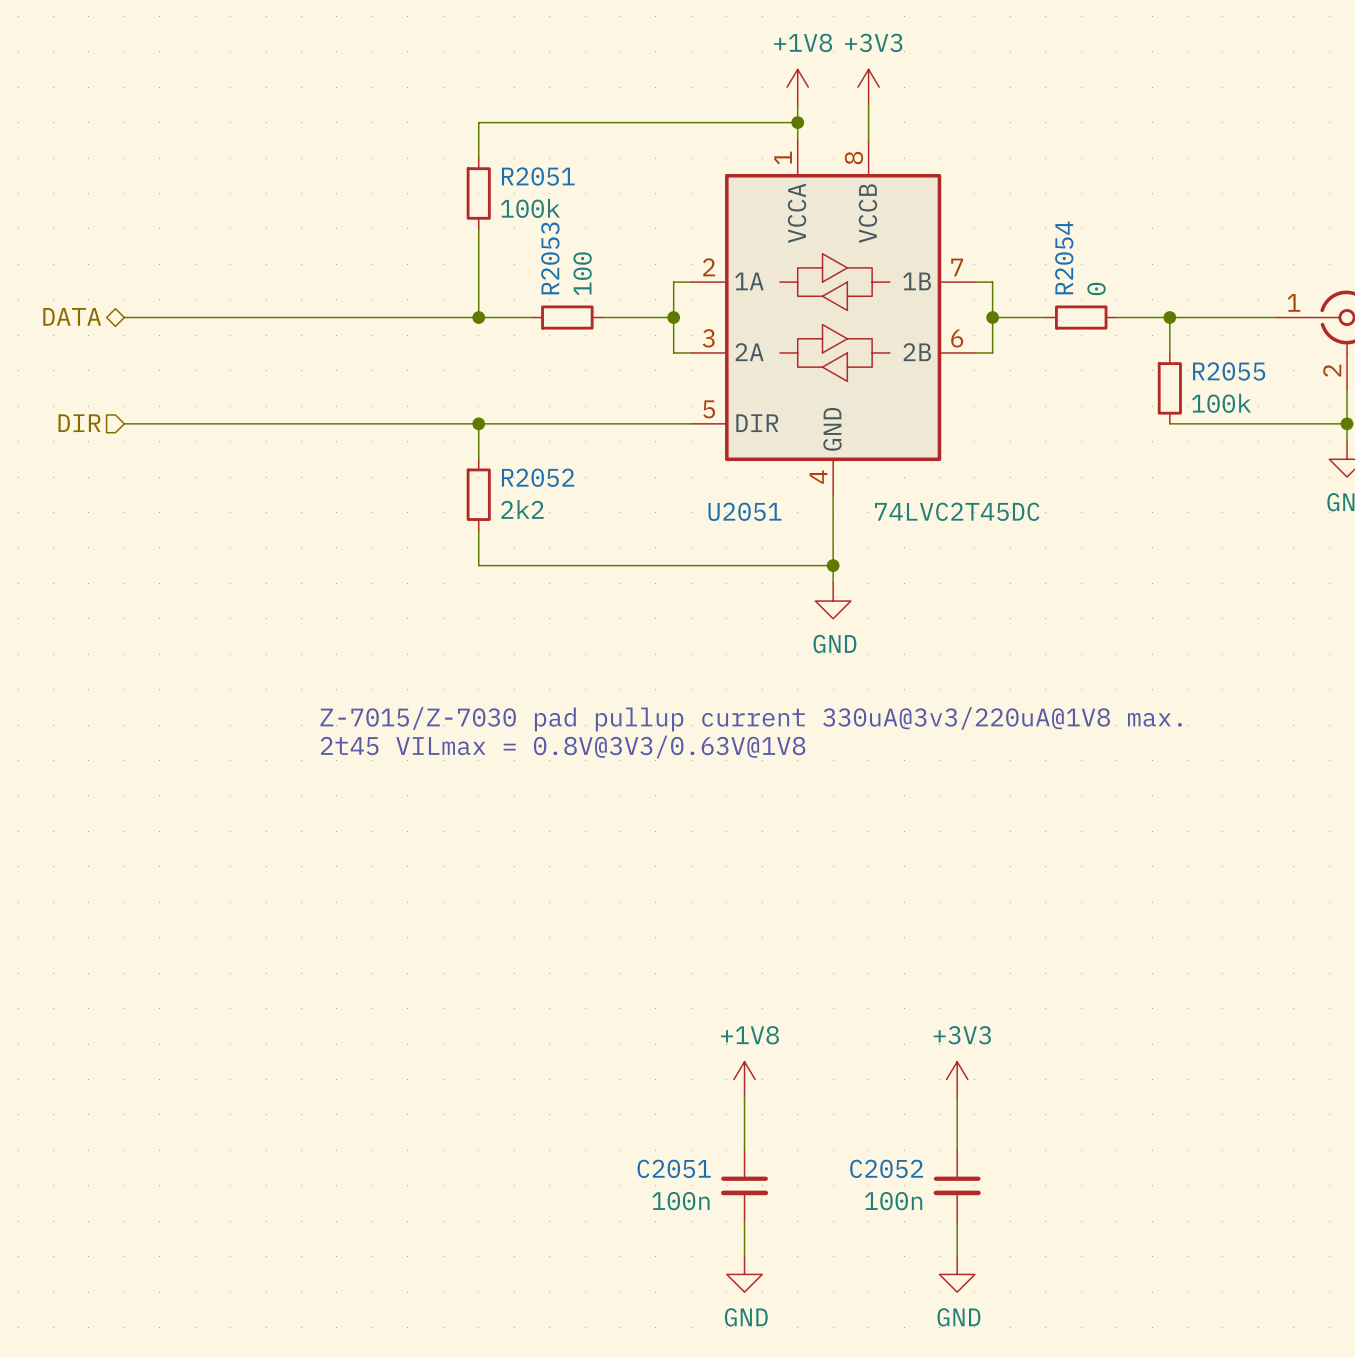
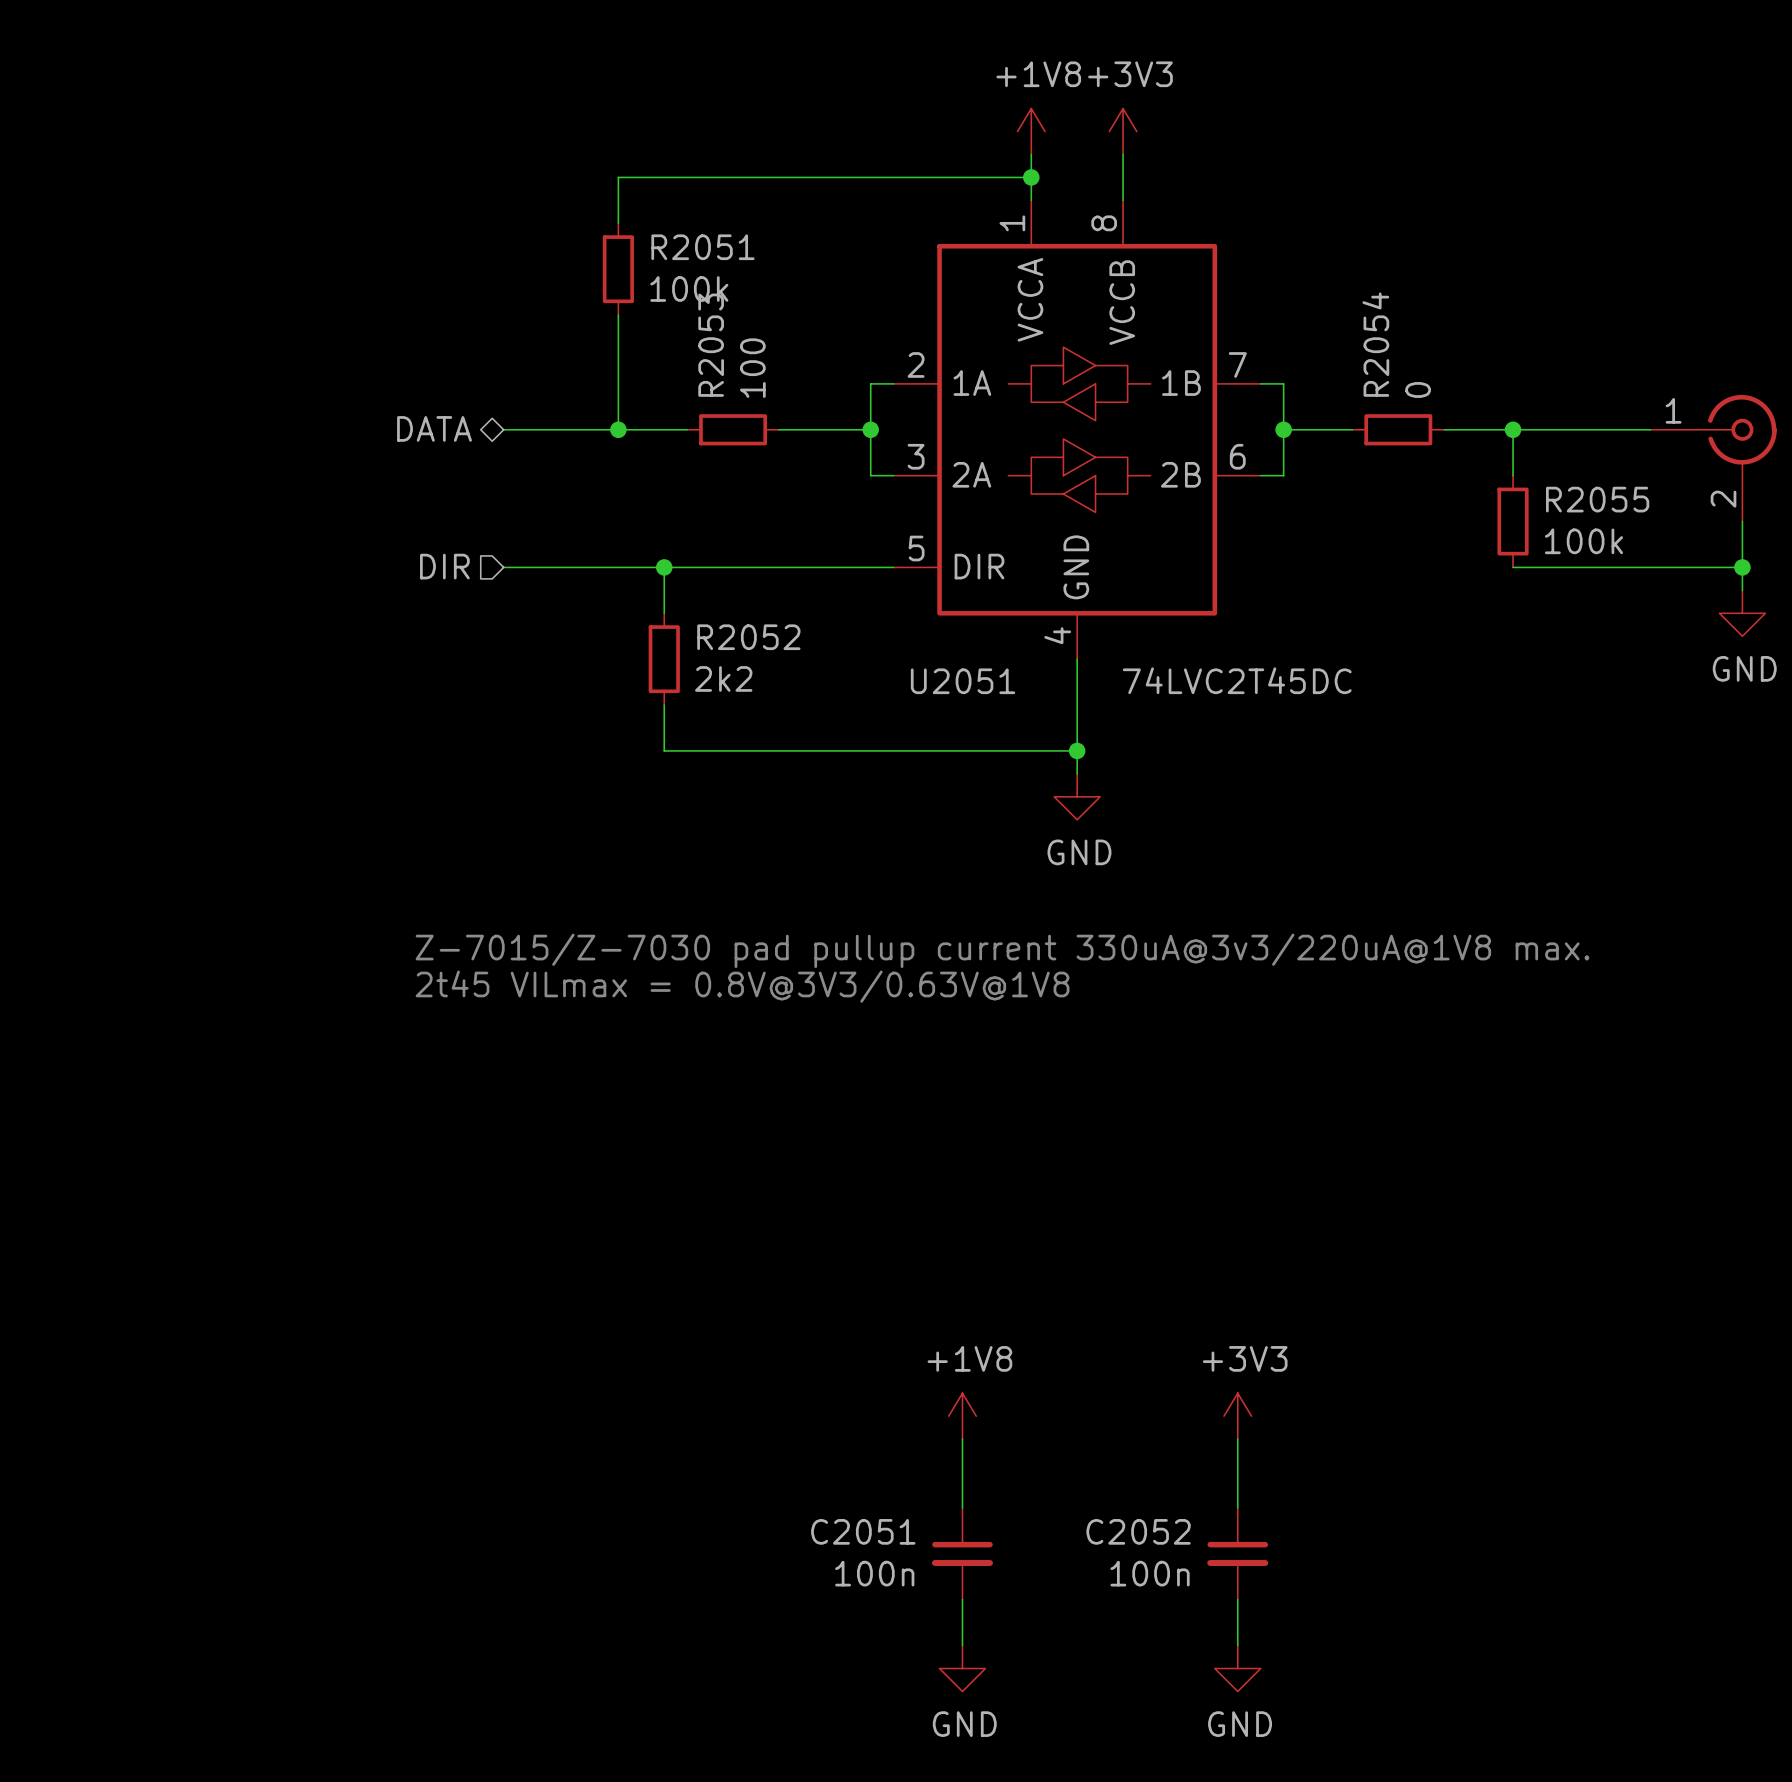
hierarchical label position: DATA (72, 316) -> DATA (434, 428)
wire: (124, 317) (390, 317) -> none
hierarchical label position: DIR (79, 423) -> DIR (444, 566)
wire: (124, 423) (390, 423) -> none
wire: (478, 423) (478, 459) -> (664, 567) (664, 613)
junction position: (478, 423) -> (664, 567)
R2052 position: (478, 494) -> (664, 659)
wire: (478, 530) (478, 565) (514, 565) -> (664, 705) (664, 750)

